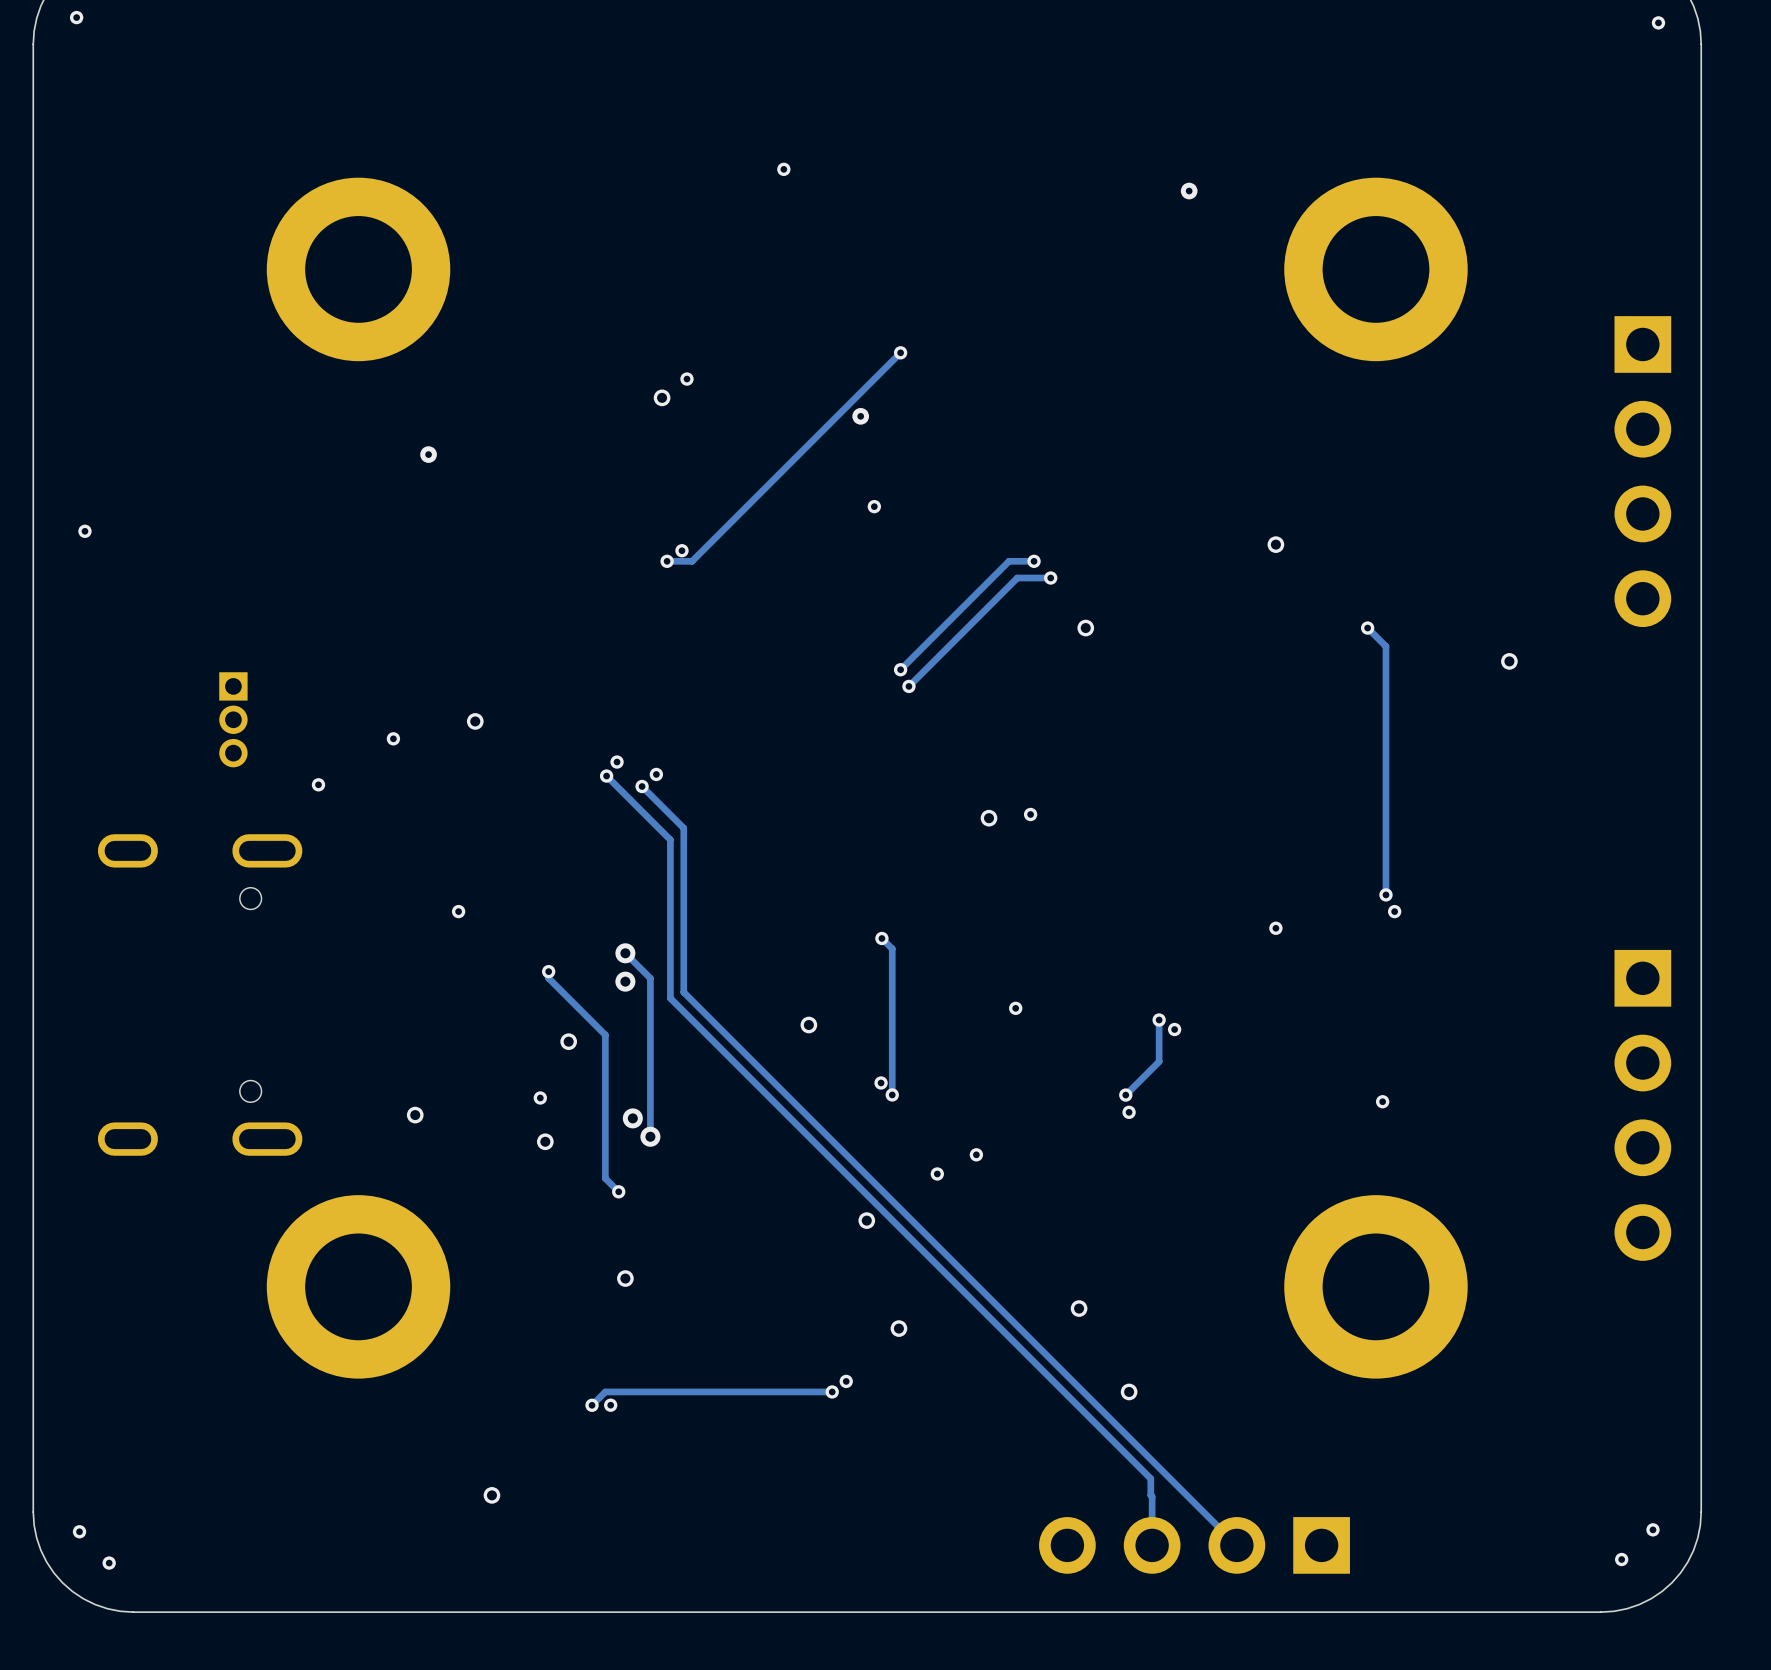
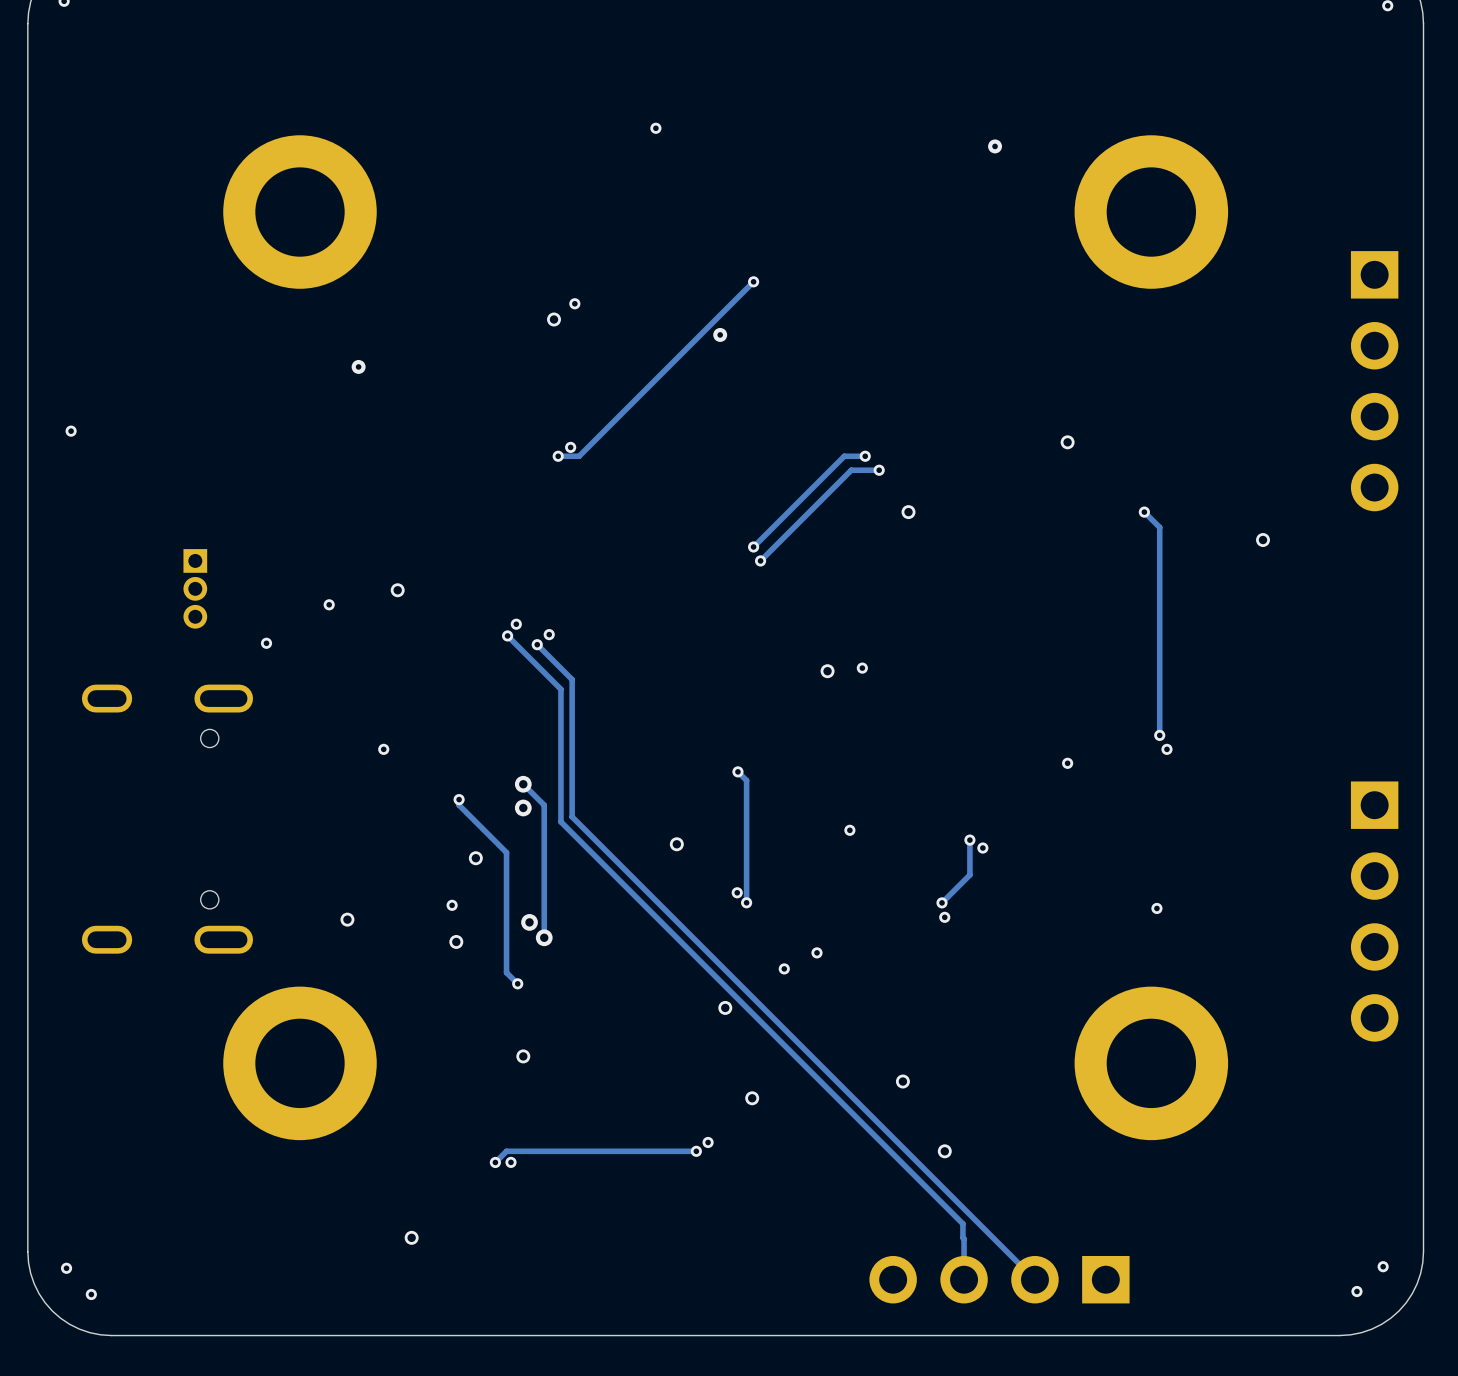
via: (874, 506) -> none

